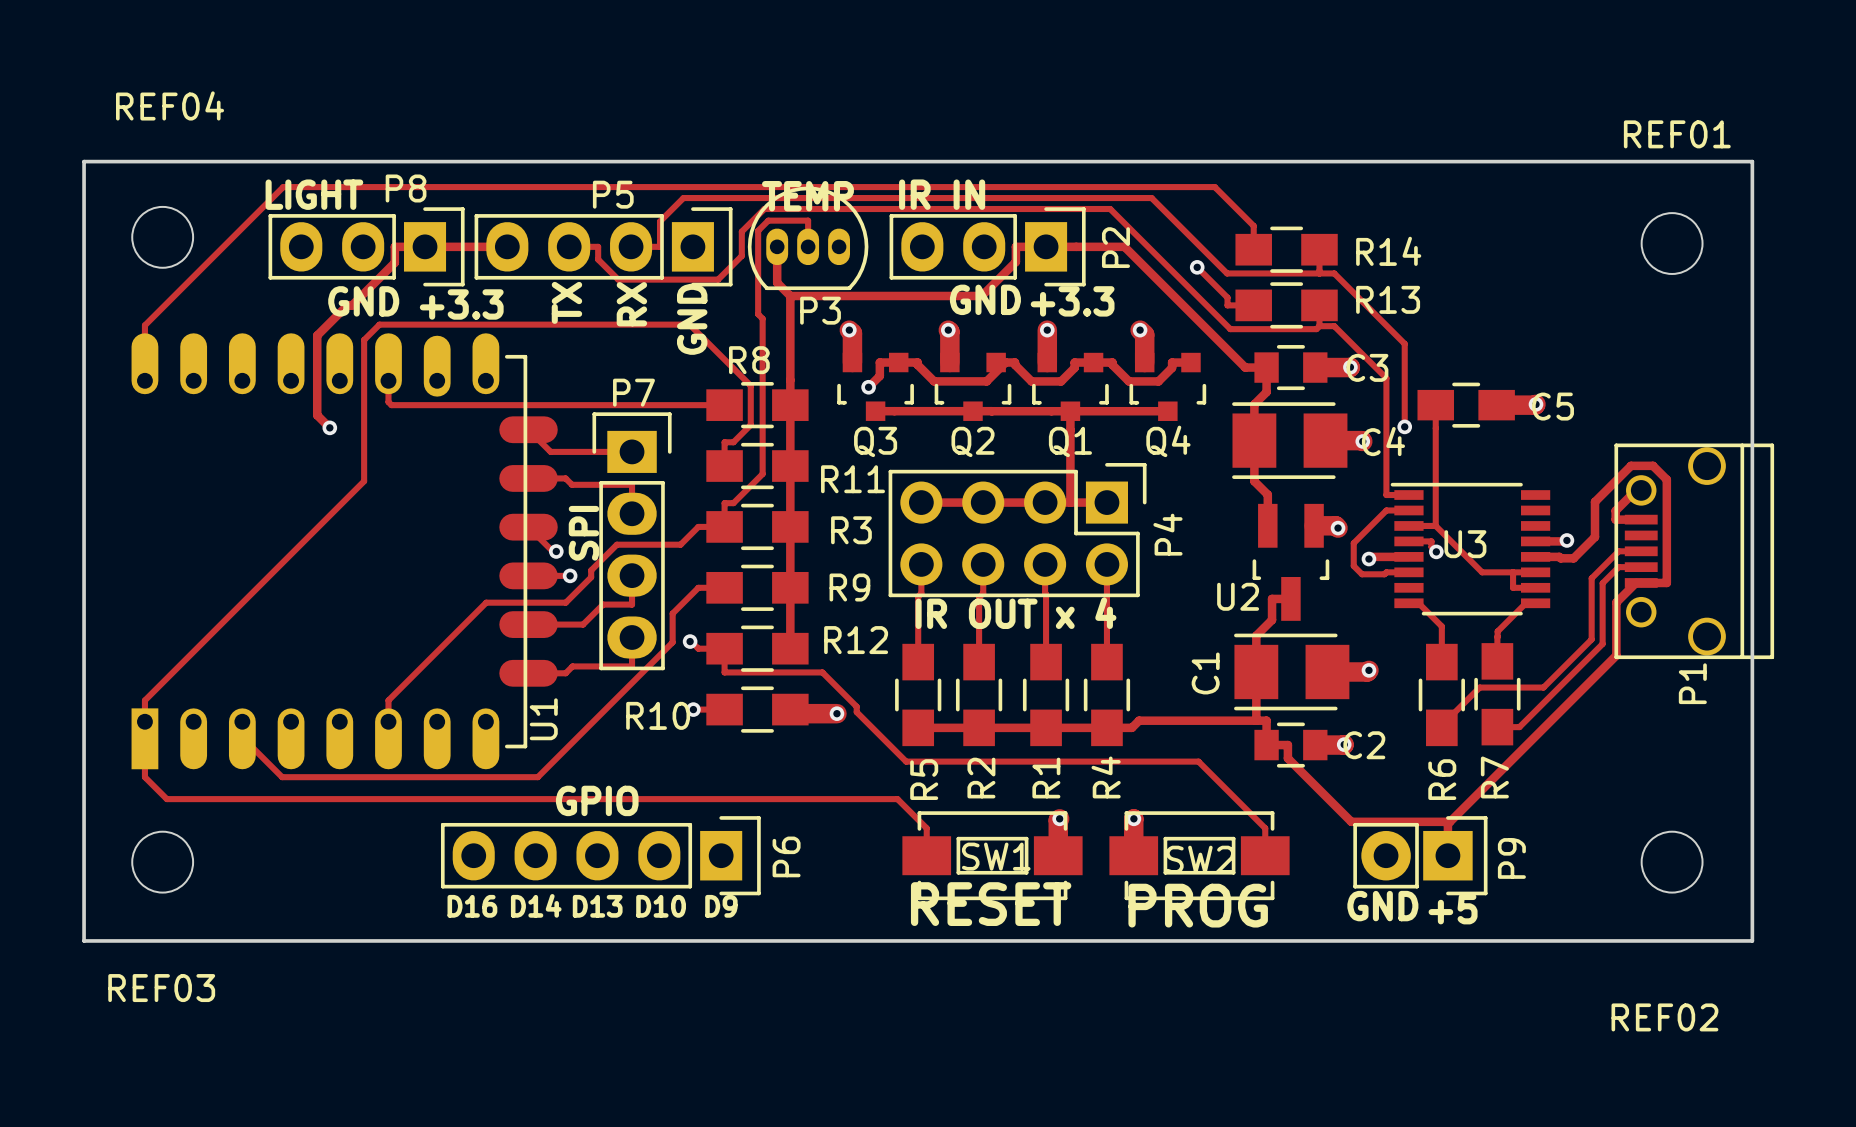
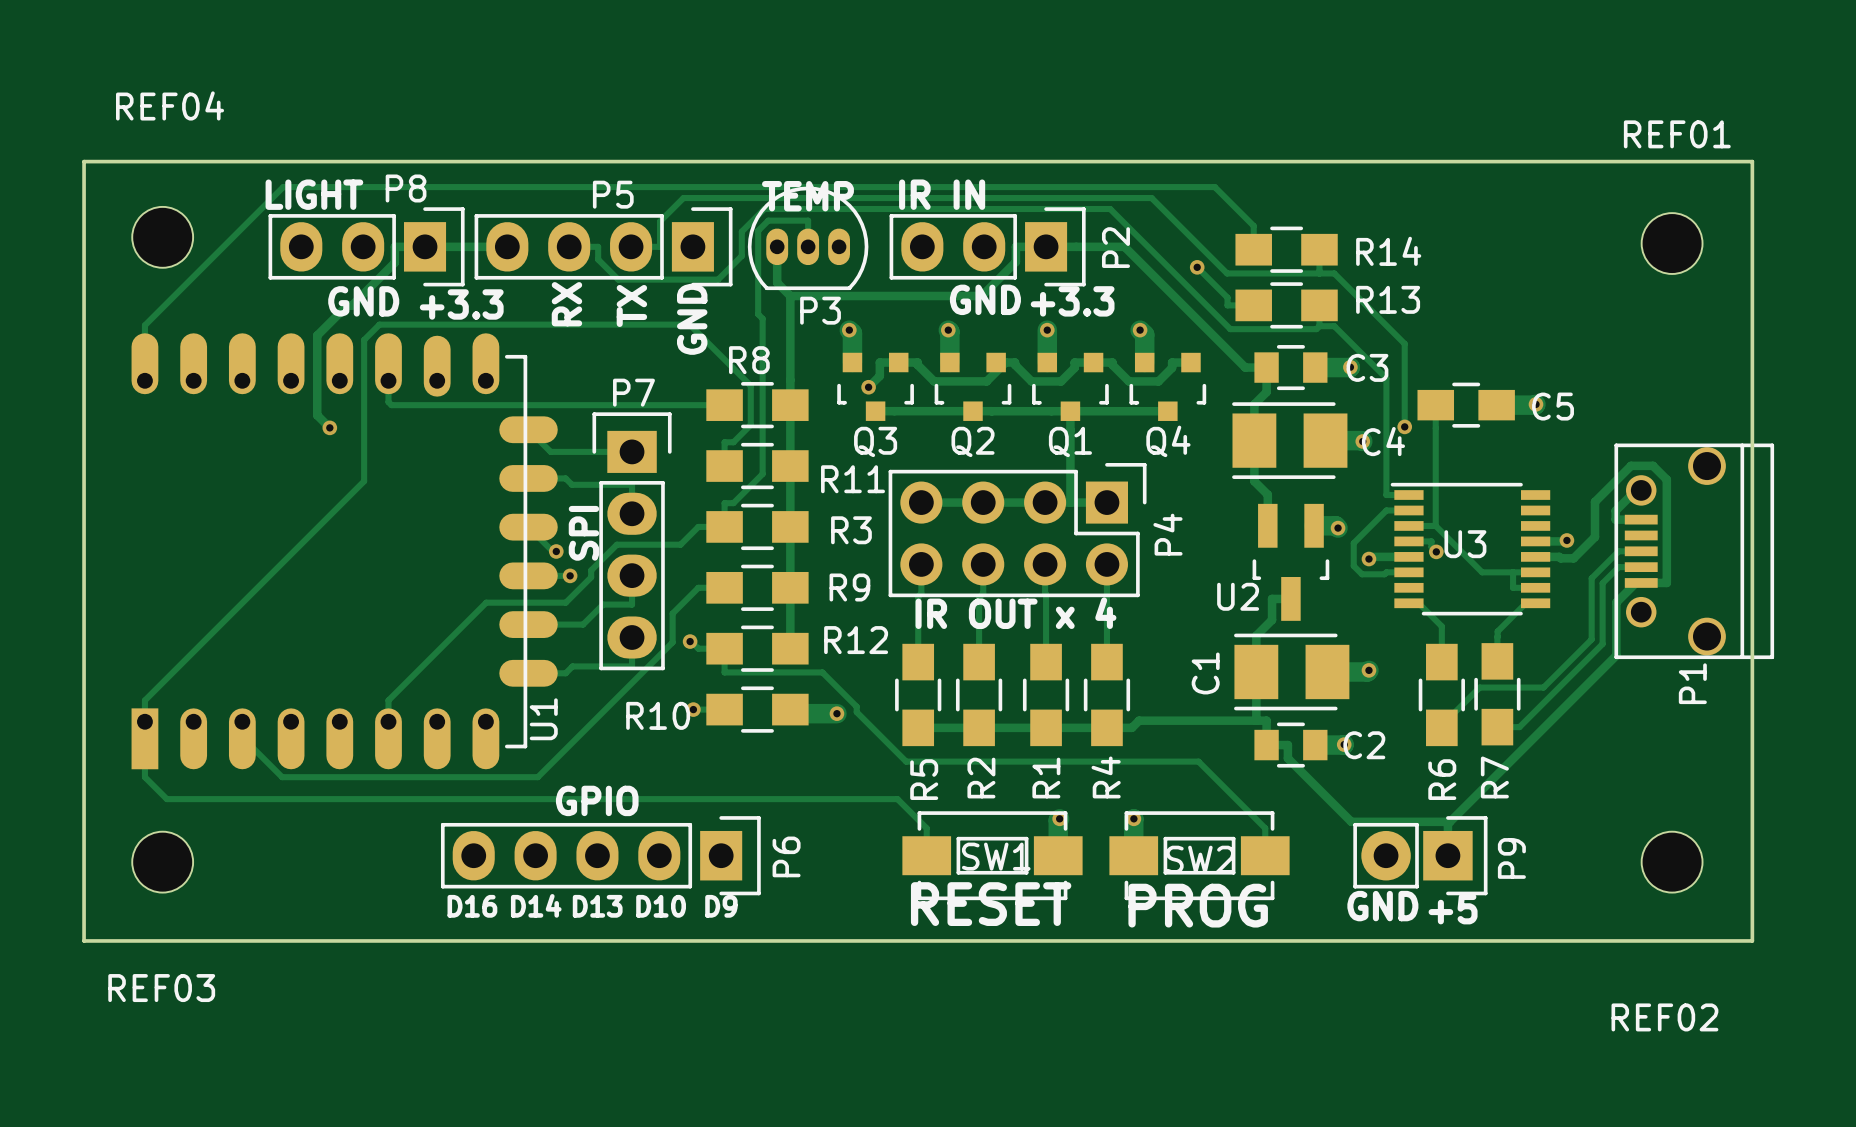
text: TX (566, 302) -> RX (566, 304)
text: RX (631, 304) -> TX (631, 305)

